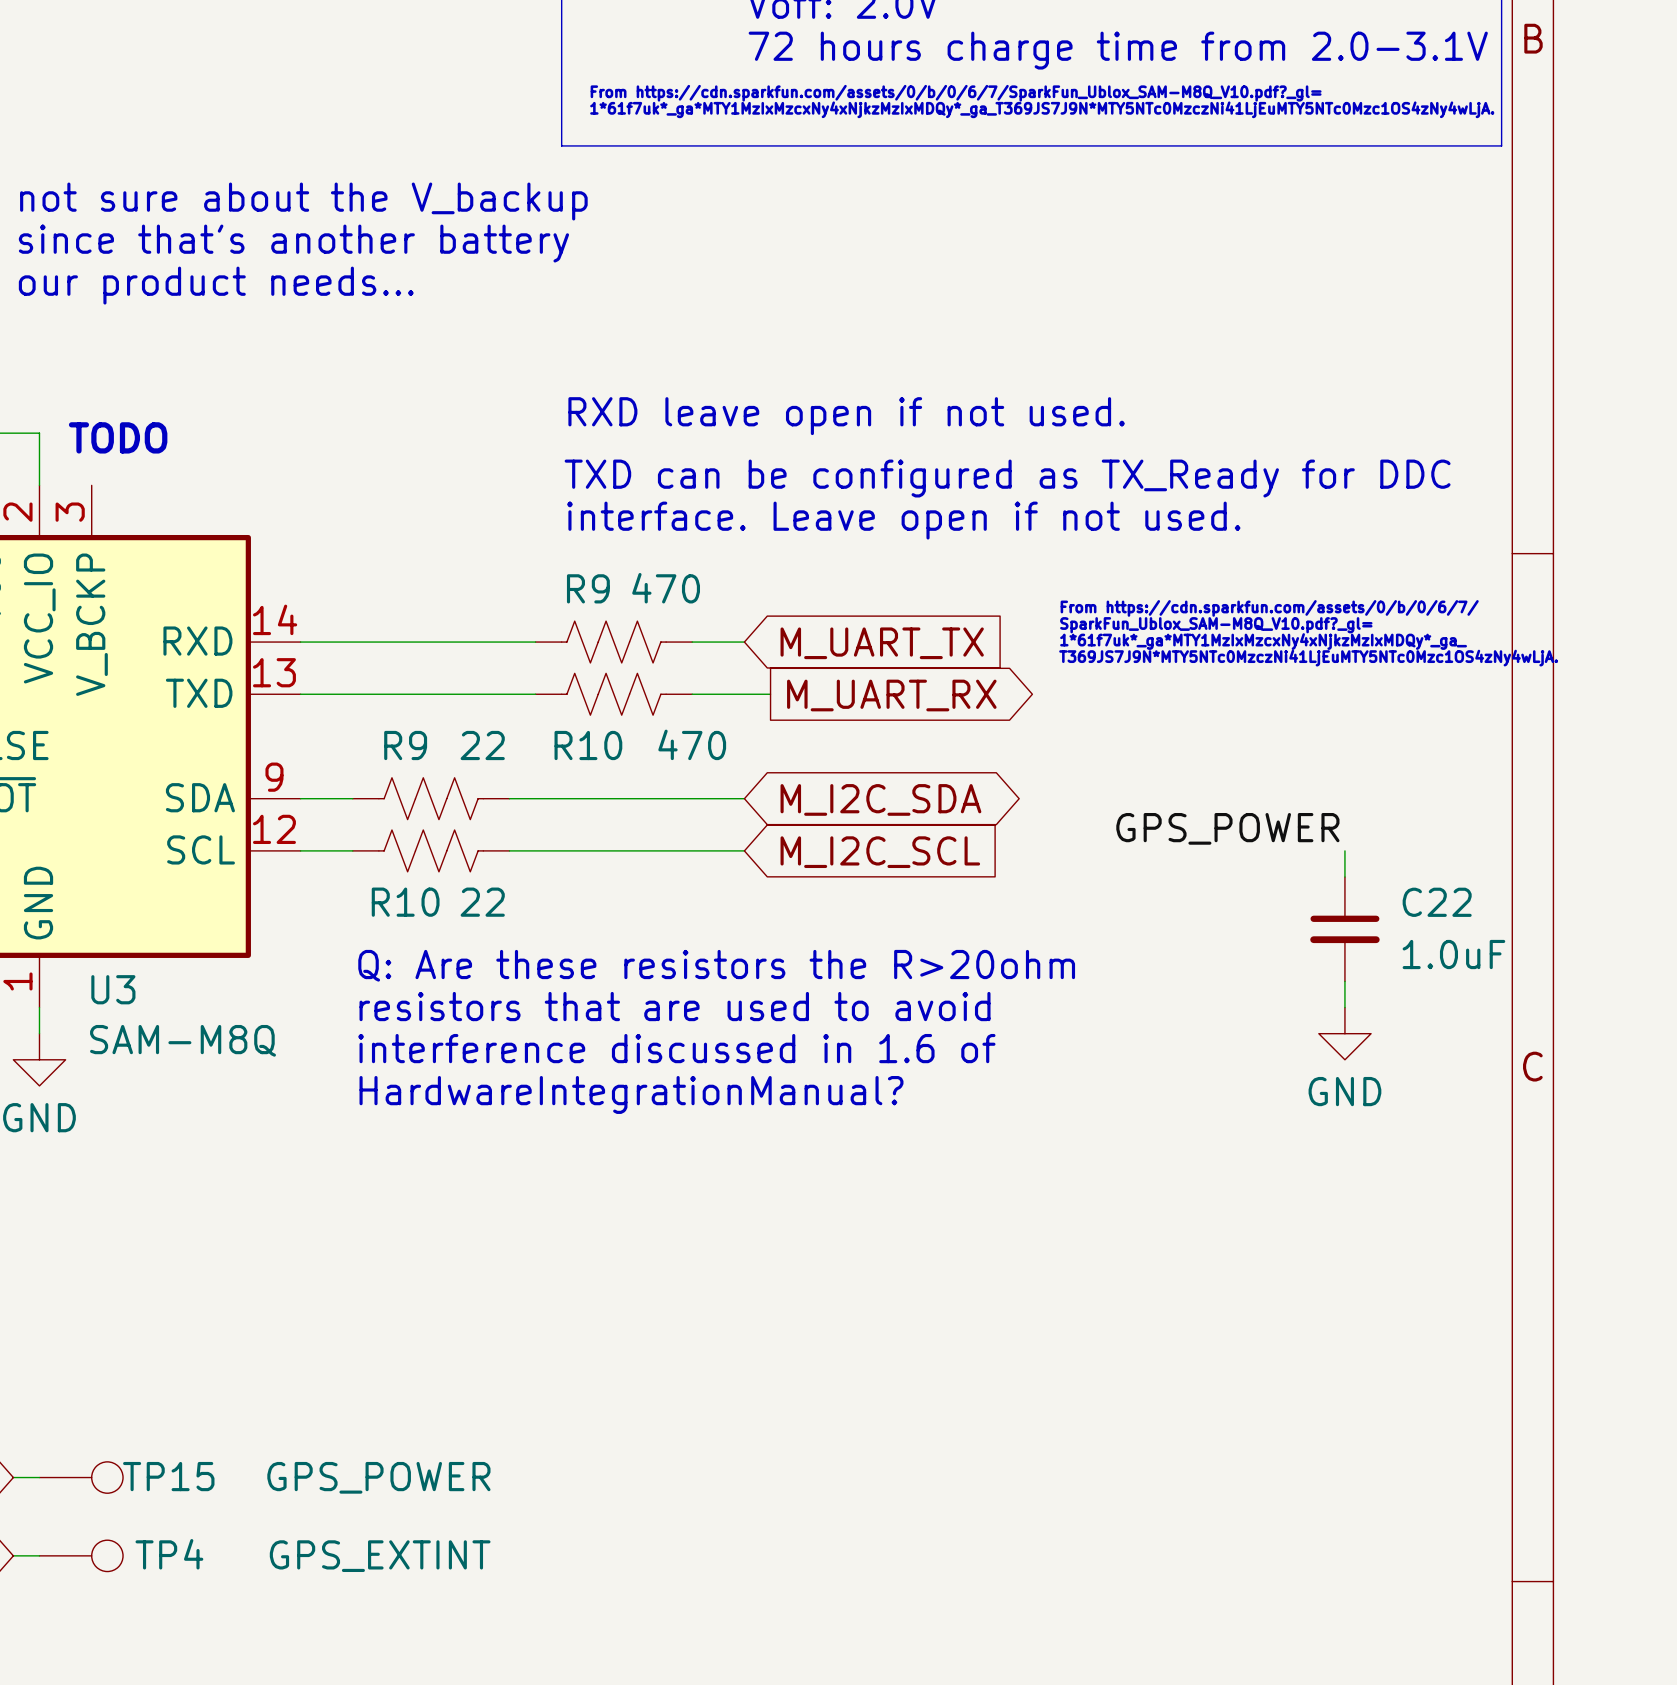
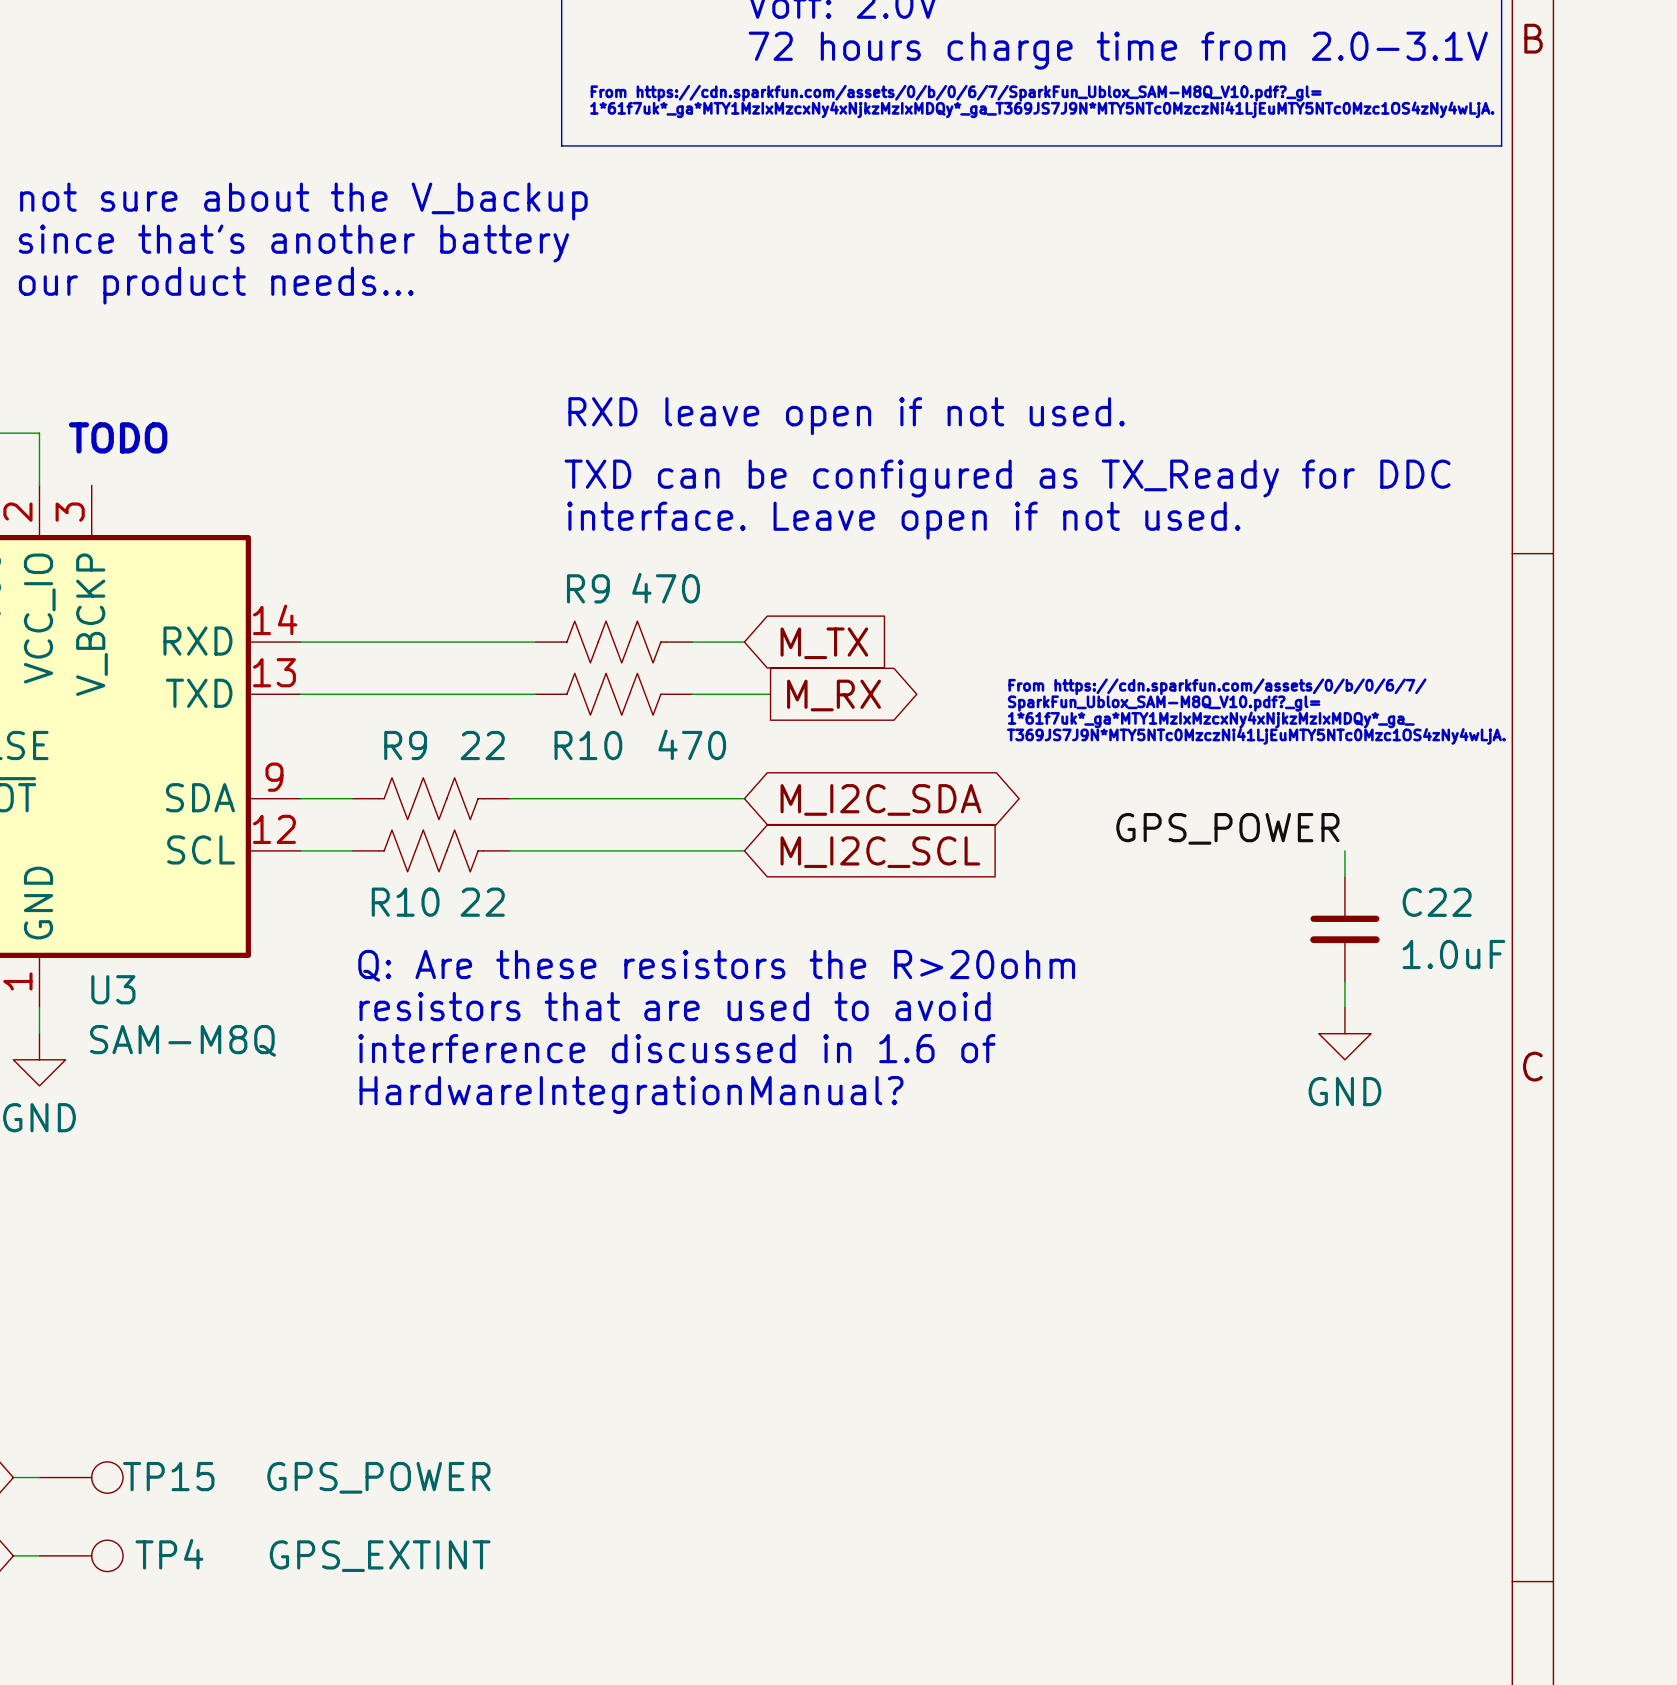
text position: From https://cdn.sparkfun.com/assets/0/b/0/6/7/ (1269, 608) -> From https://cdn.sparkfun.com/assets/0/b/0/6/7/ (1217, 686)
text position: SparkFun_Ublox_SAM-M8Q_V10.pdf?_gl= (1216, 625) -> SparkFun_Ublox_SAM-M8Q_V10.pdf?_gl= (1164, 703)
text position: 1*61f7uk*_ga*MTY1MzIxMzcxNy4xNjkzMzIxMDQy*_ga_ (1263, 641) -> 1*61f7uk*_ga*MTY1MzIxMzcxNy4xNjkzMzIxMDQy*_ga_ (1211, 719)
global label: M_UART_TX (882, 643) -> M_TX (824, 643)
text position: T369JS7J9N*MTY5NTc0MzczNi41LjEuMTY5NTc0Mzc1OS4zNy4wLjA. (1308, 658) -> T369JS7J9N*MTY5NTc0MzczNi41LjEuMTY5NTc0Mzc1OS4zNy4wLjA. (1256, 736)
global label: M_UART_RX (891, 695) -> M_RX (833, 695)

